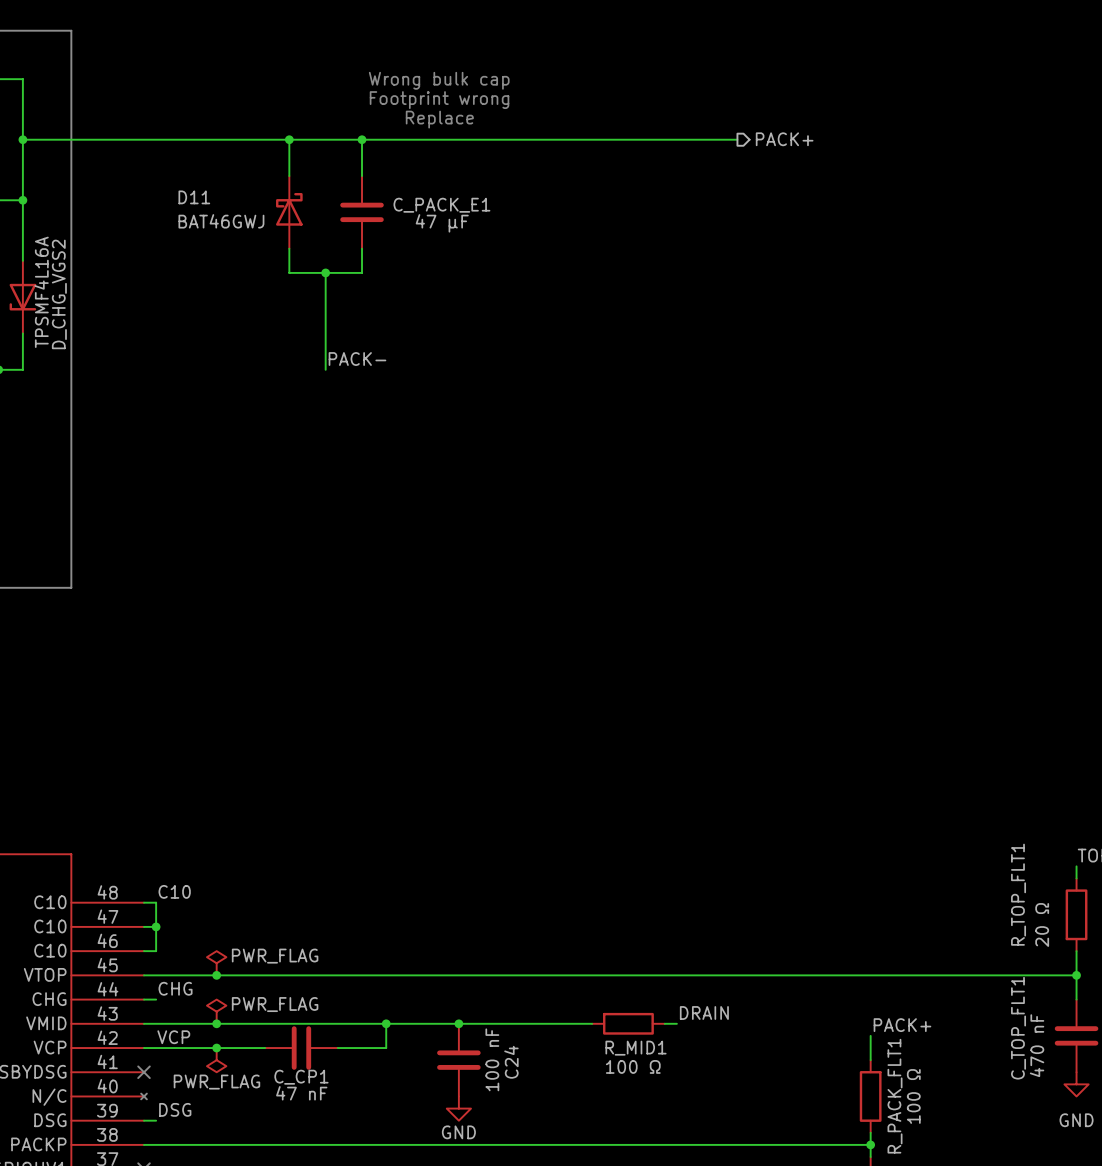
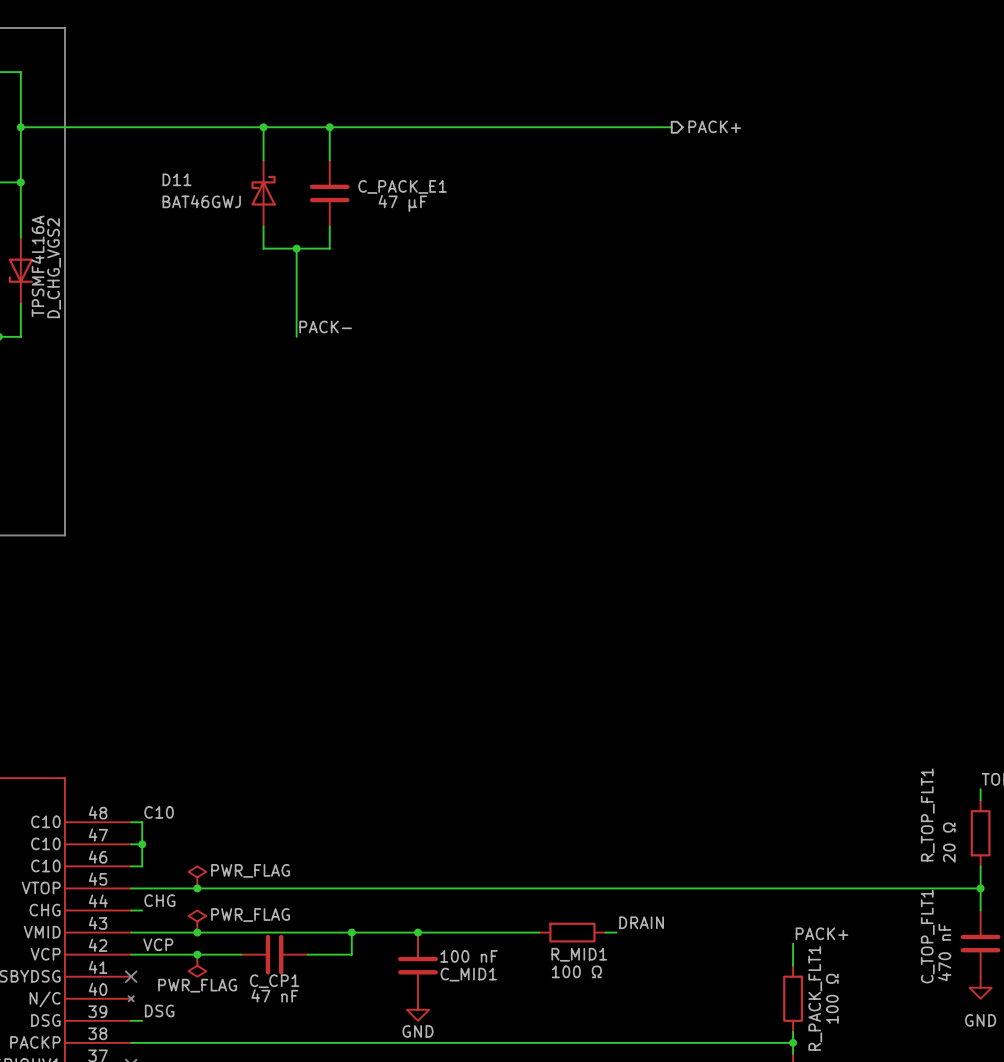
text: Wrong bulk cap (439, 80) -> none
text: Footprint wrong (439, 100) -> none
text: Replace (439, 119) -> none
C24 value rotation: 0° (492, 1059) -> 90° clockwise (469, 956)
C24 name: C24 (511, 1062) -> C_MID1 (468, 974)

